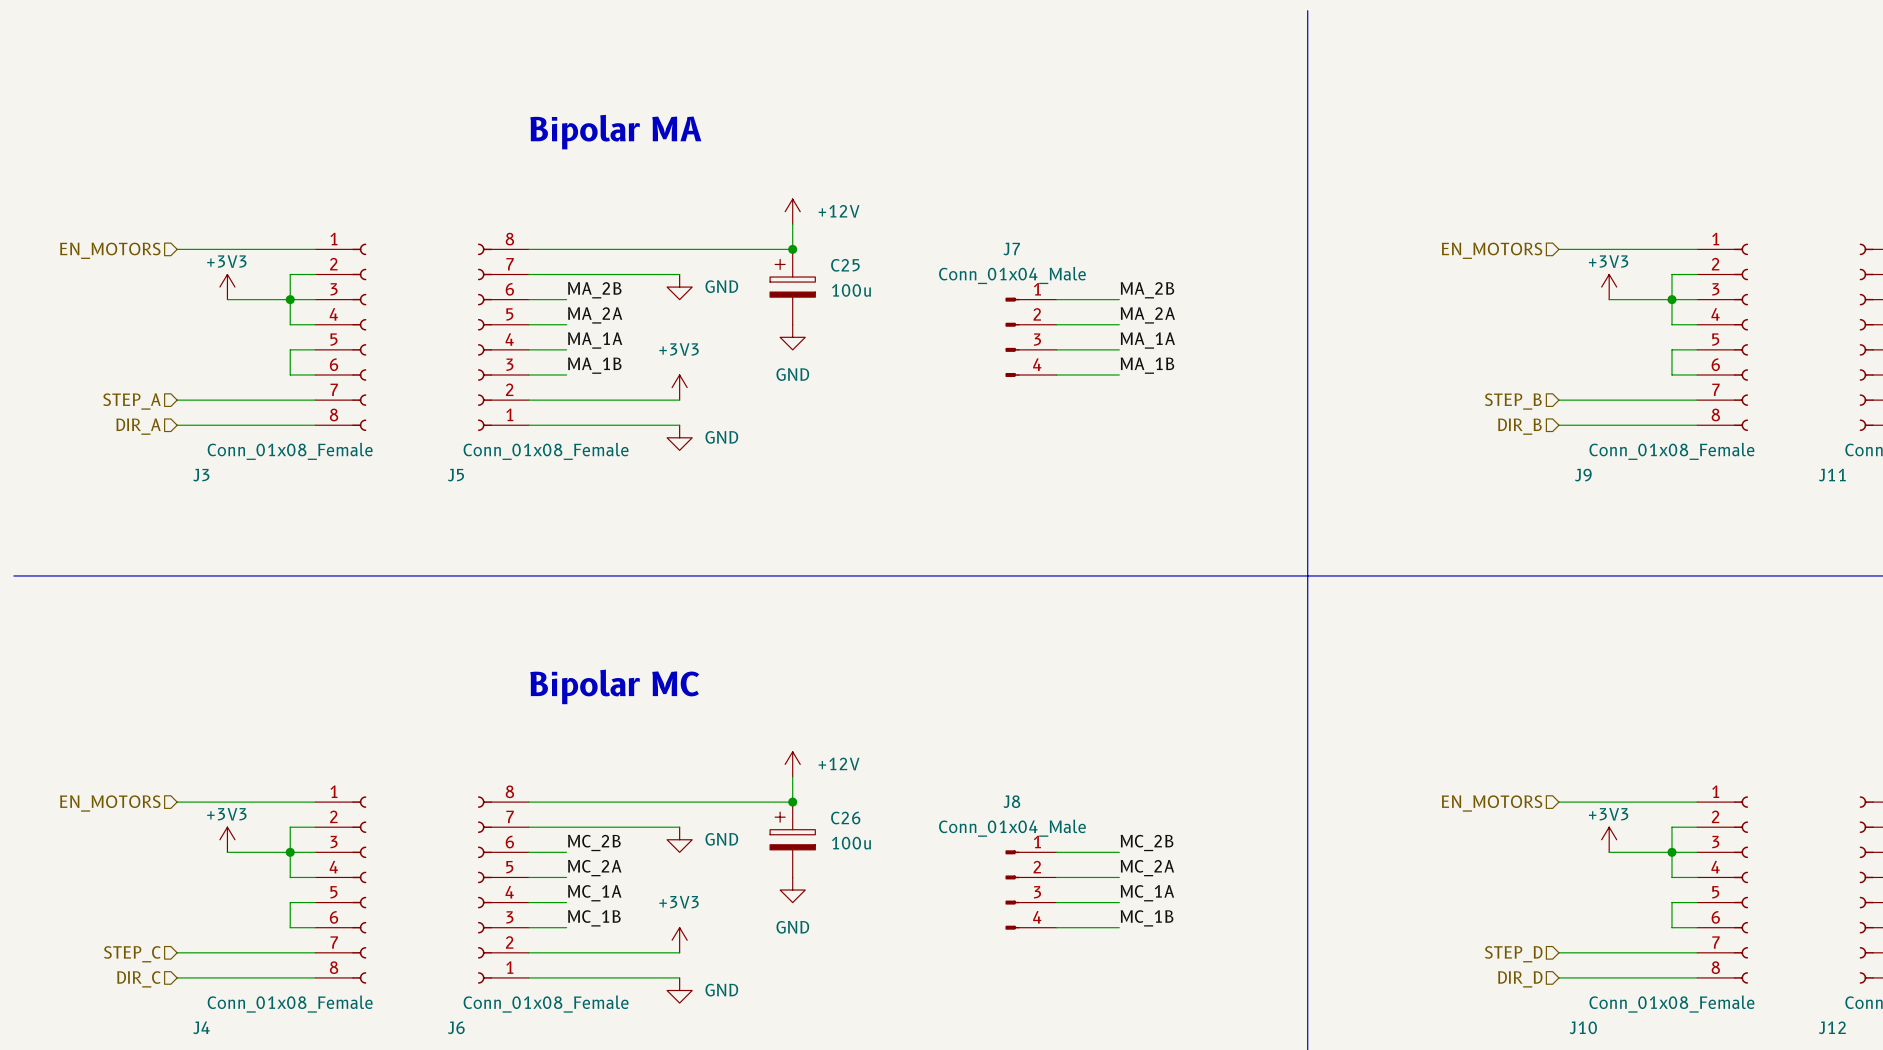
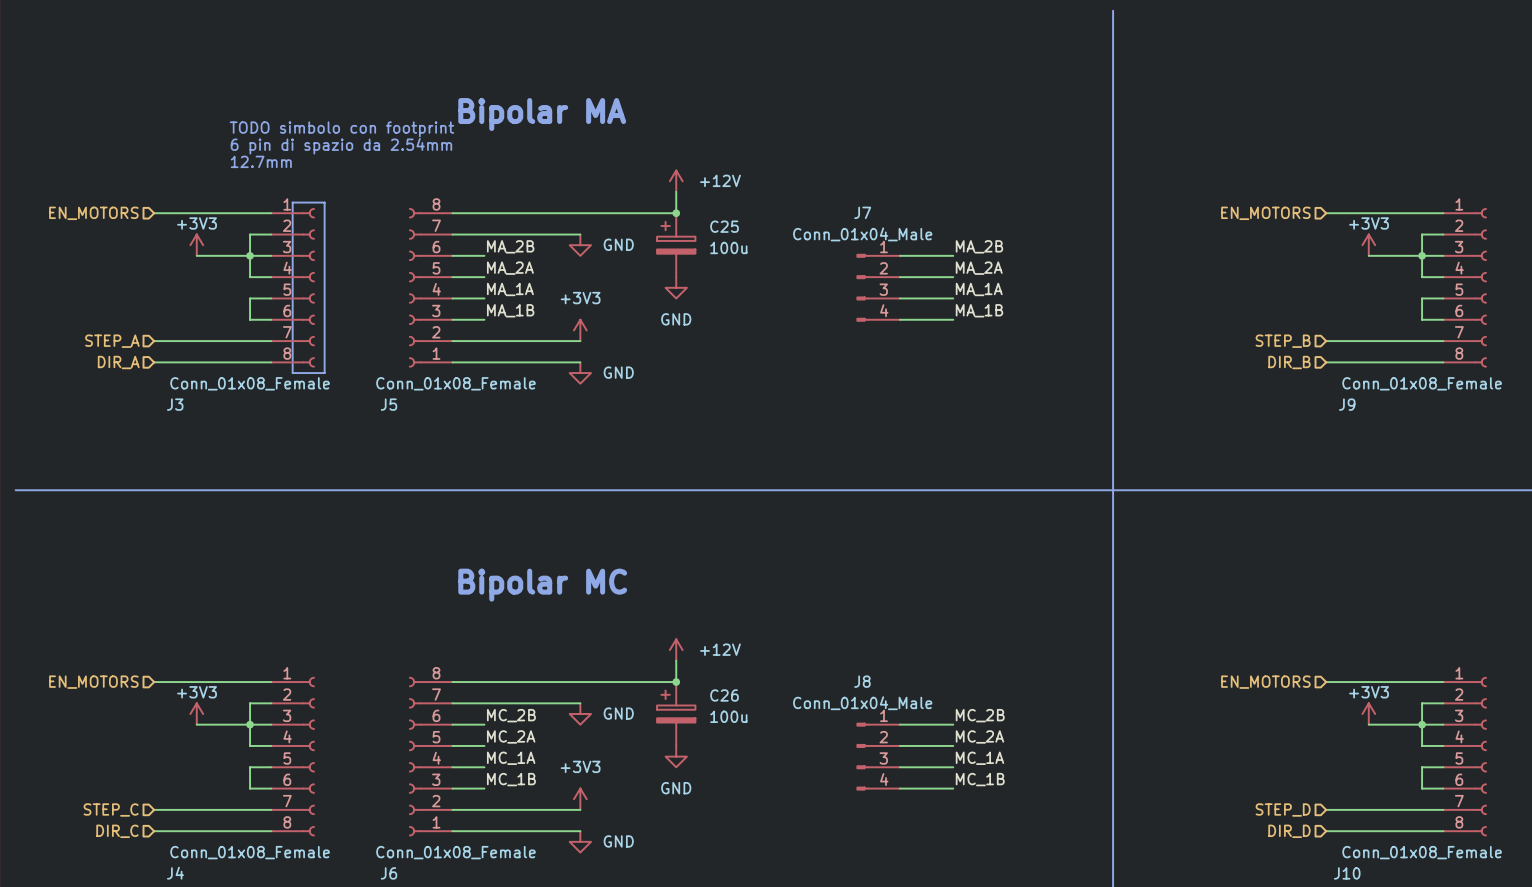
text: none -> TODO simbolo con footprint (341, 129)
text: none -> 6 pin di spazio da 2.54mm (341, 146)
text: none -> 12.7mm (261, 161)
line: none -> (292, 202) (292, 373) (324, 373) (324, 202) (292, 202)

